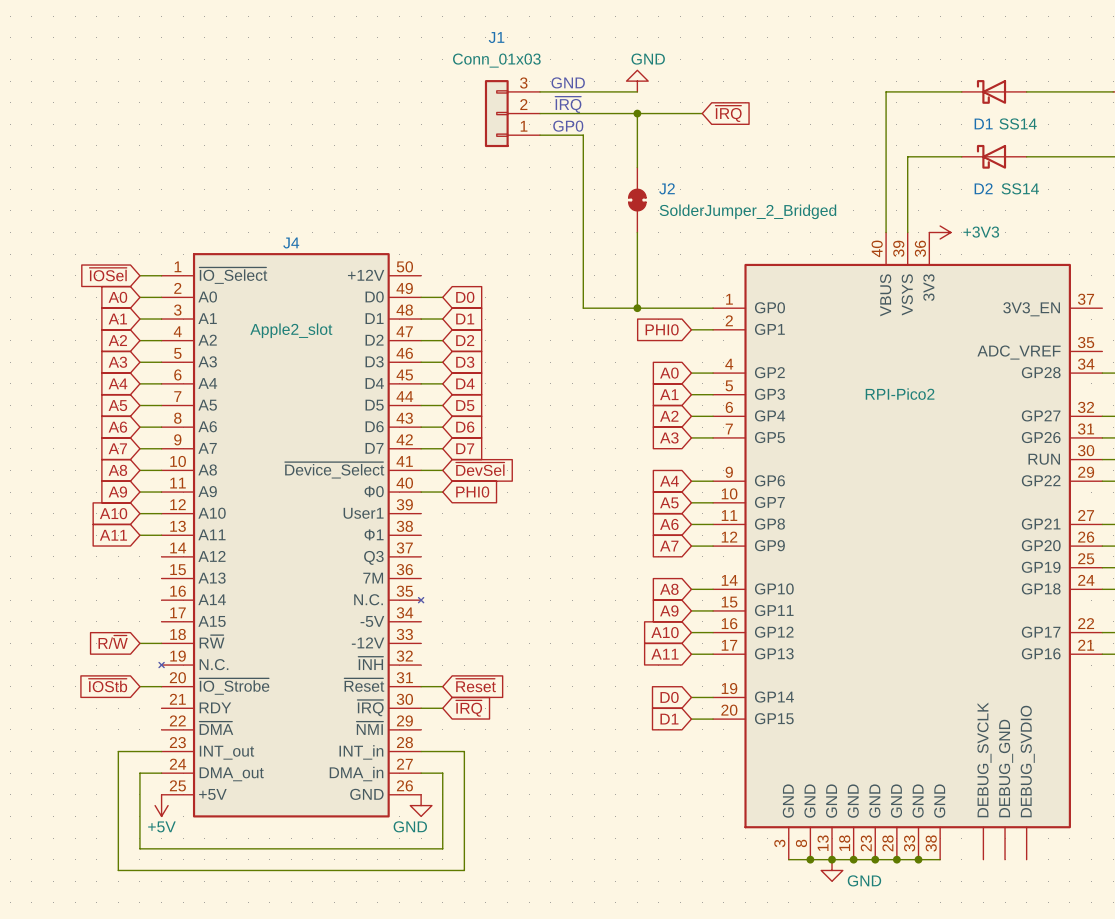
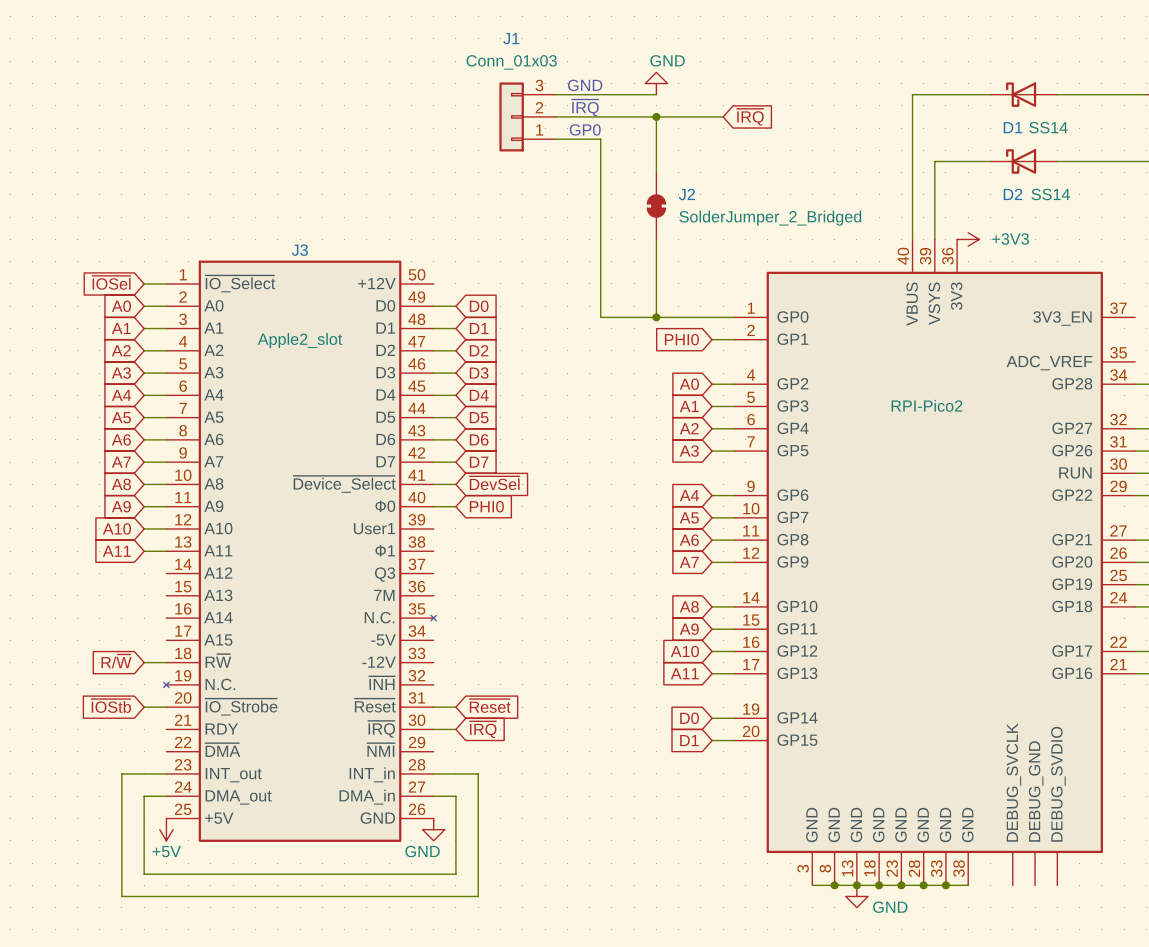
J4 name: J4 (291, 242) -> J3 (299, 250)

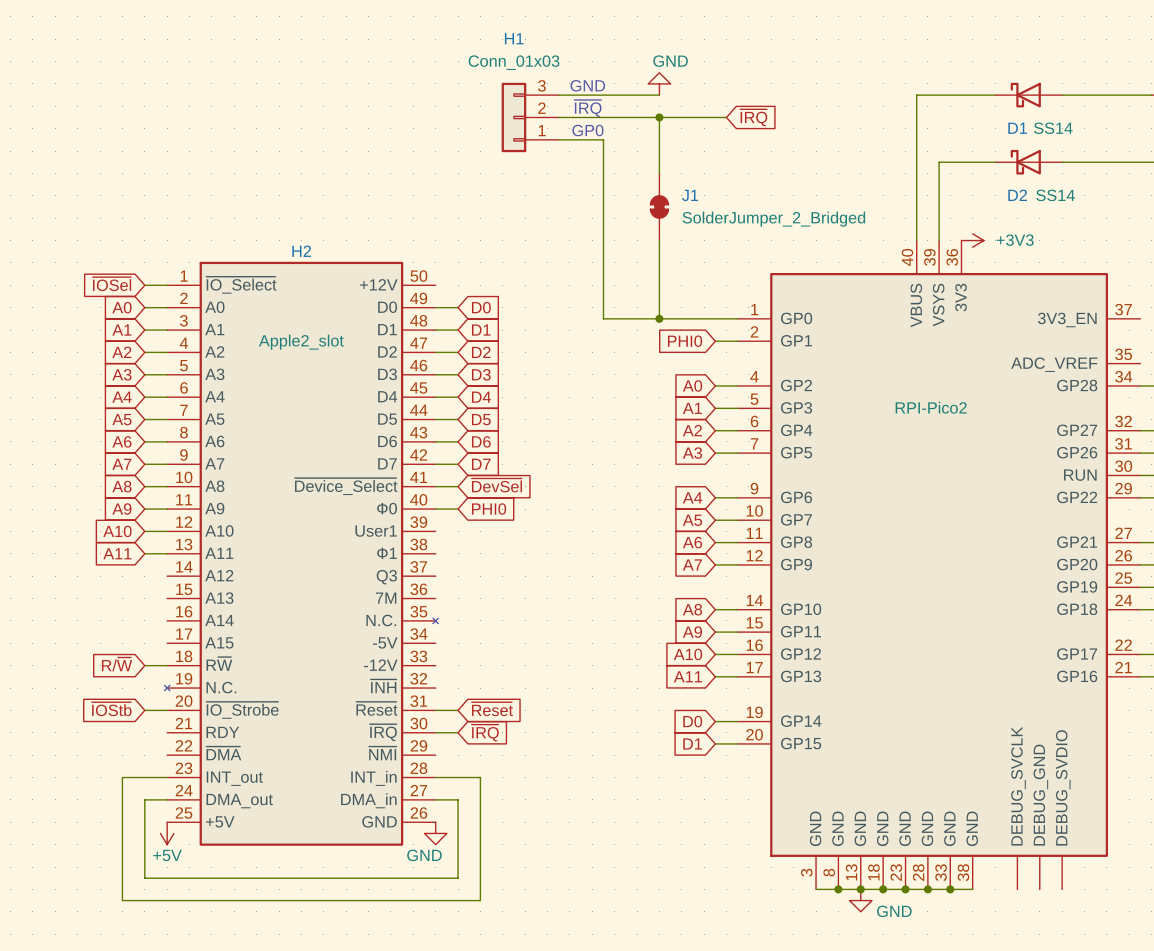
J1 name: J1 (511, 38) -> H1 (514, 38)
J2 name: J2 (686, 194) -> J1 (690, 195)
J3 name: J3 (299, 250) -> H2 (301, 251)

